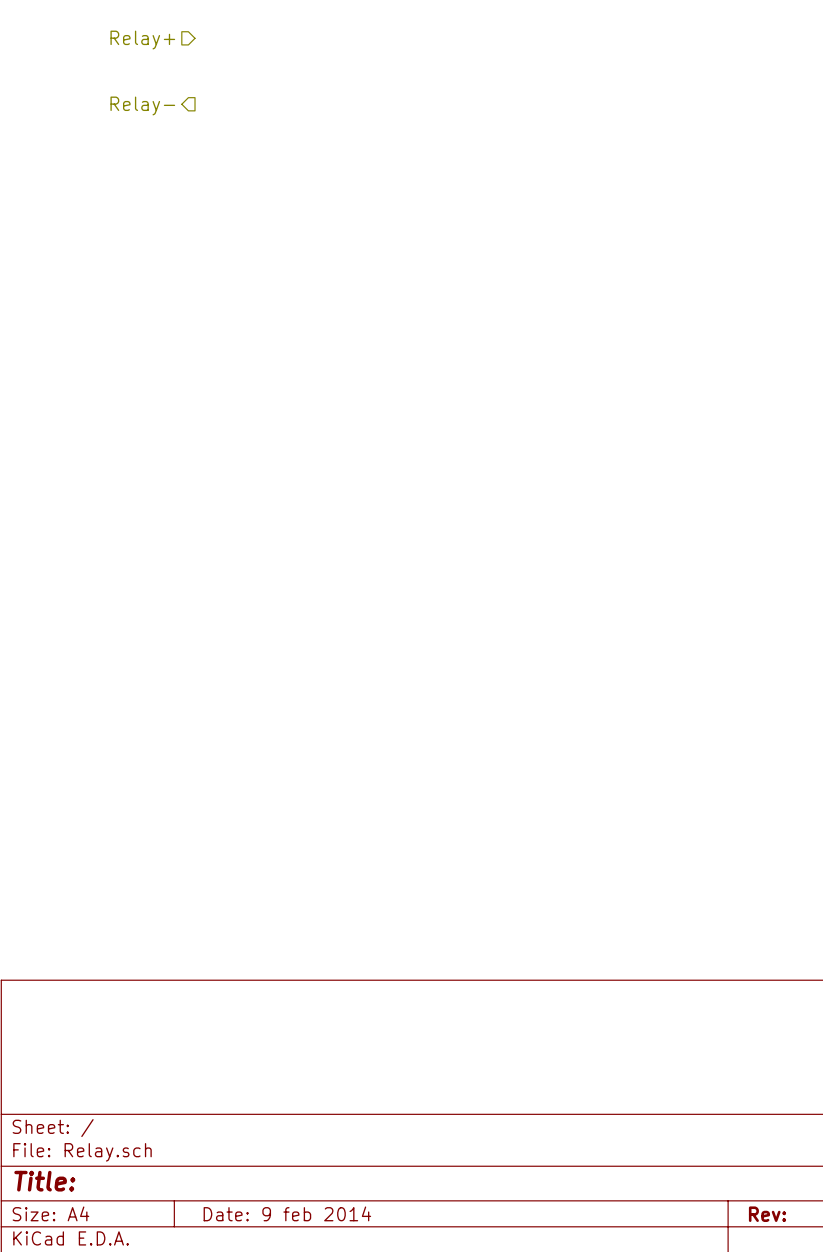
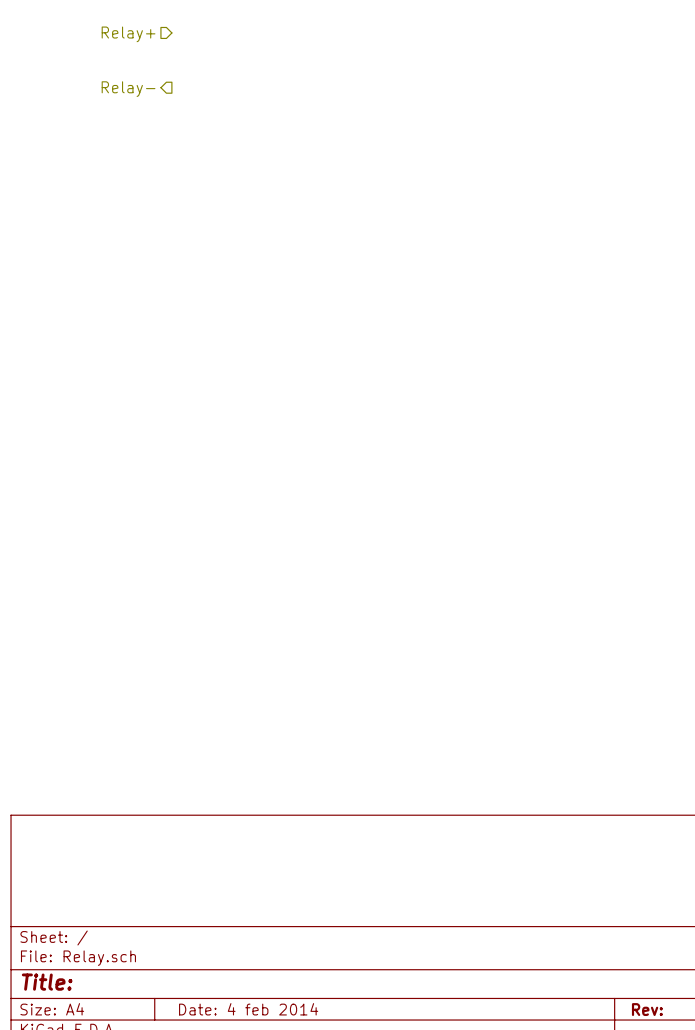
title block: Date: 9 feb 2014 (287, 1213) -> Date: 4 feb 2014 (248, 1009)

